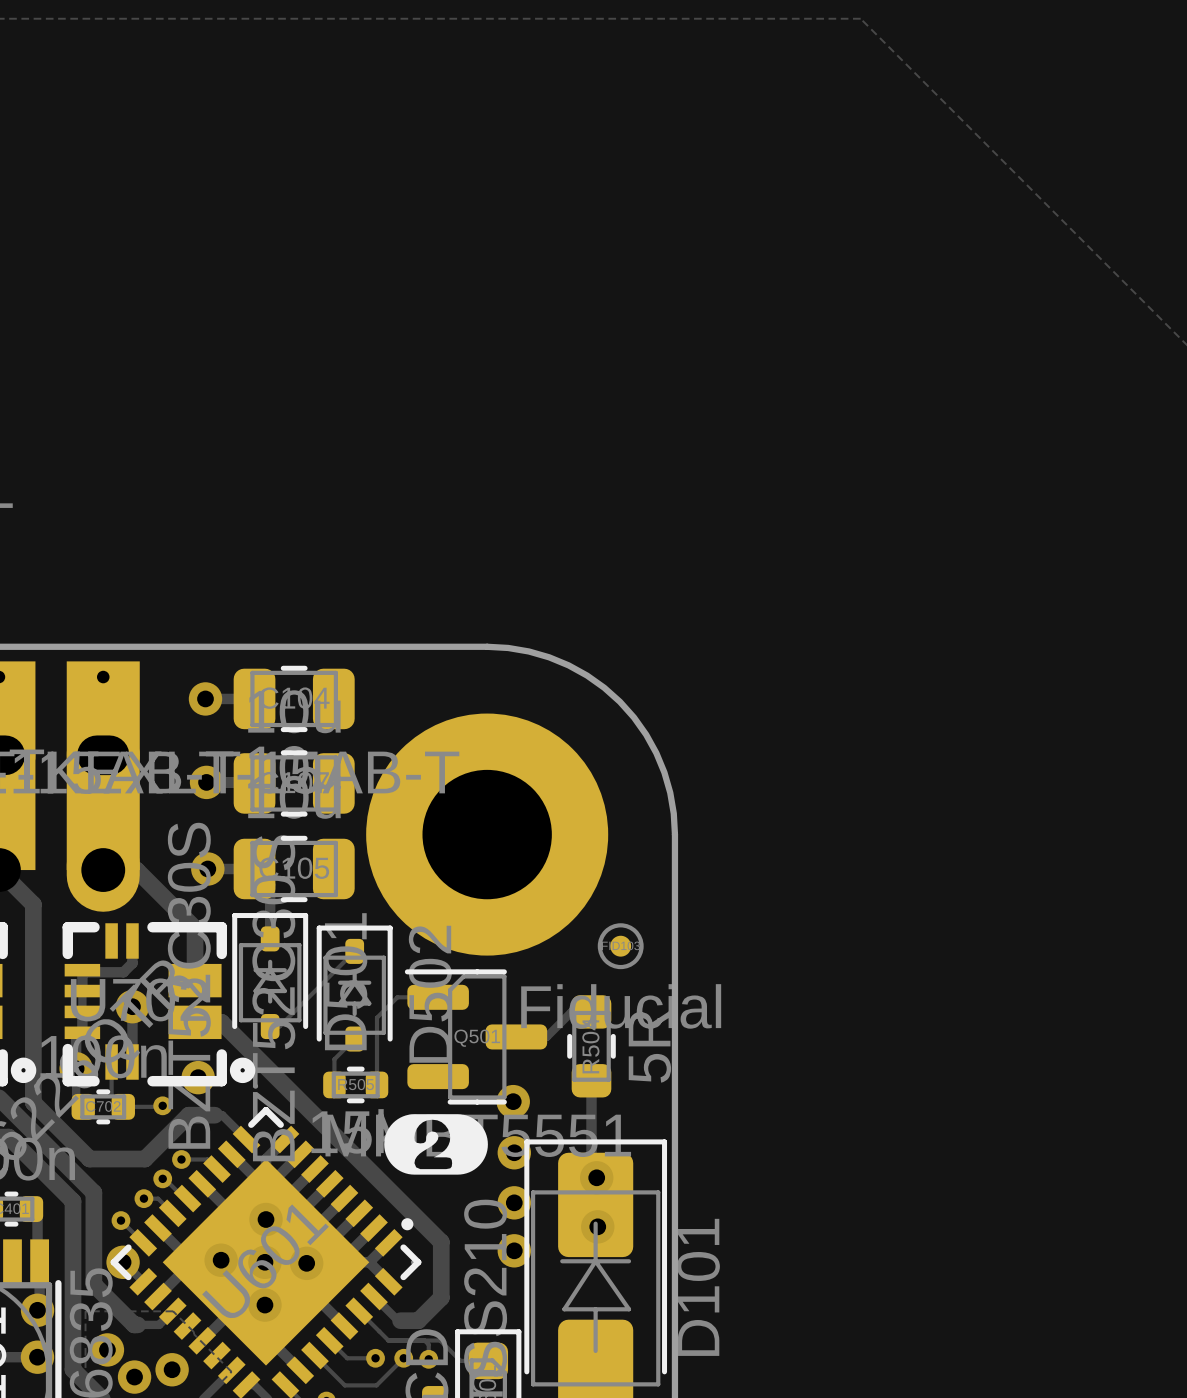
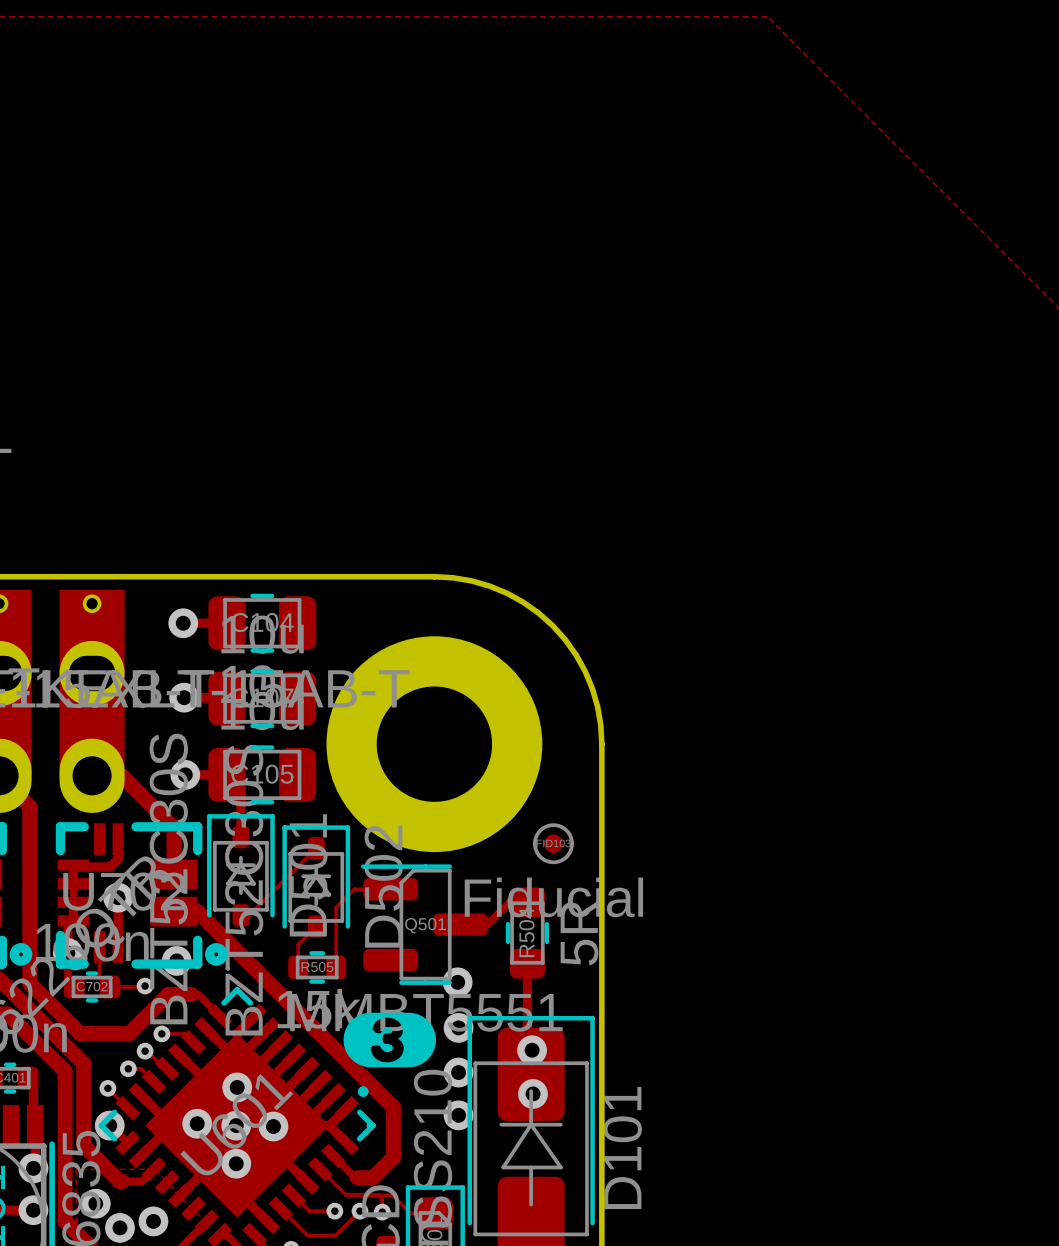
drawing shape: [384, 1114, 488, 1175] -> [343, 1012, 436, 1068]

